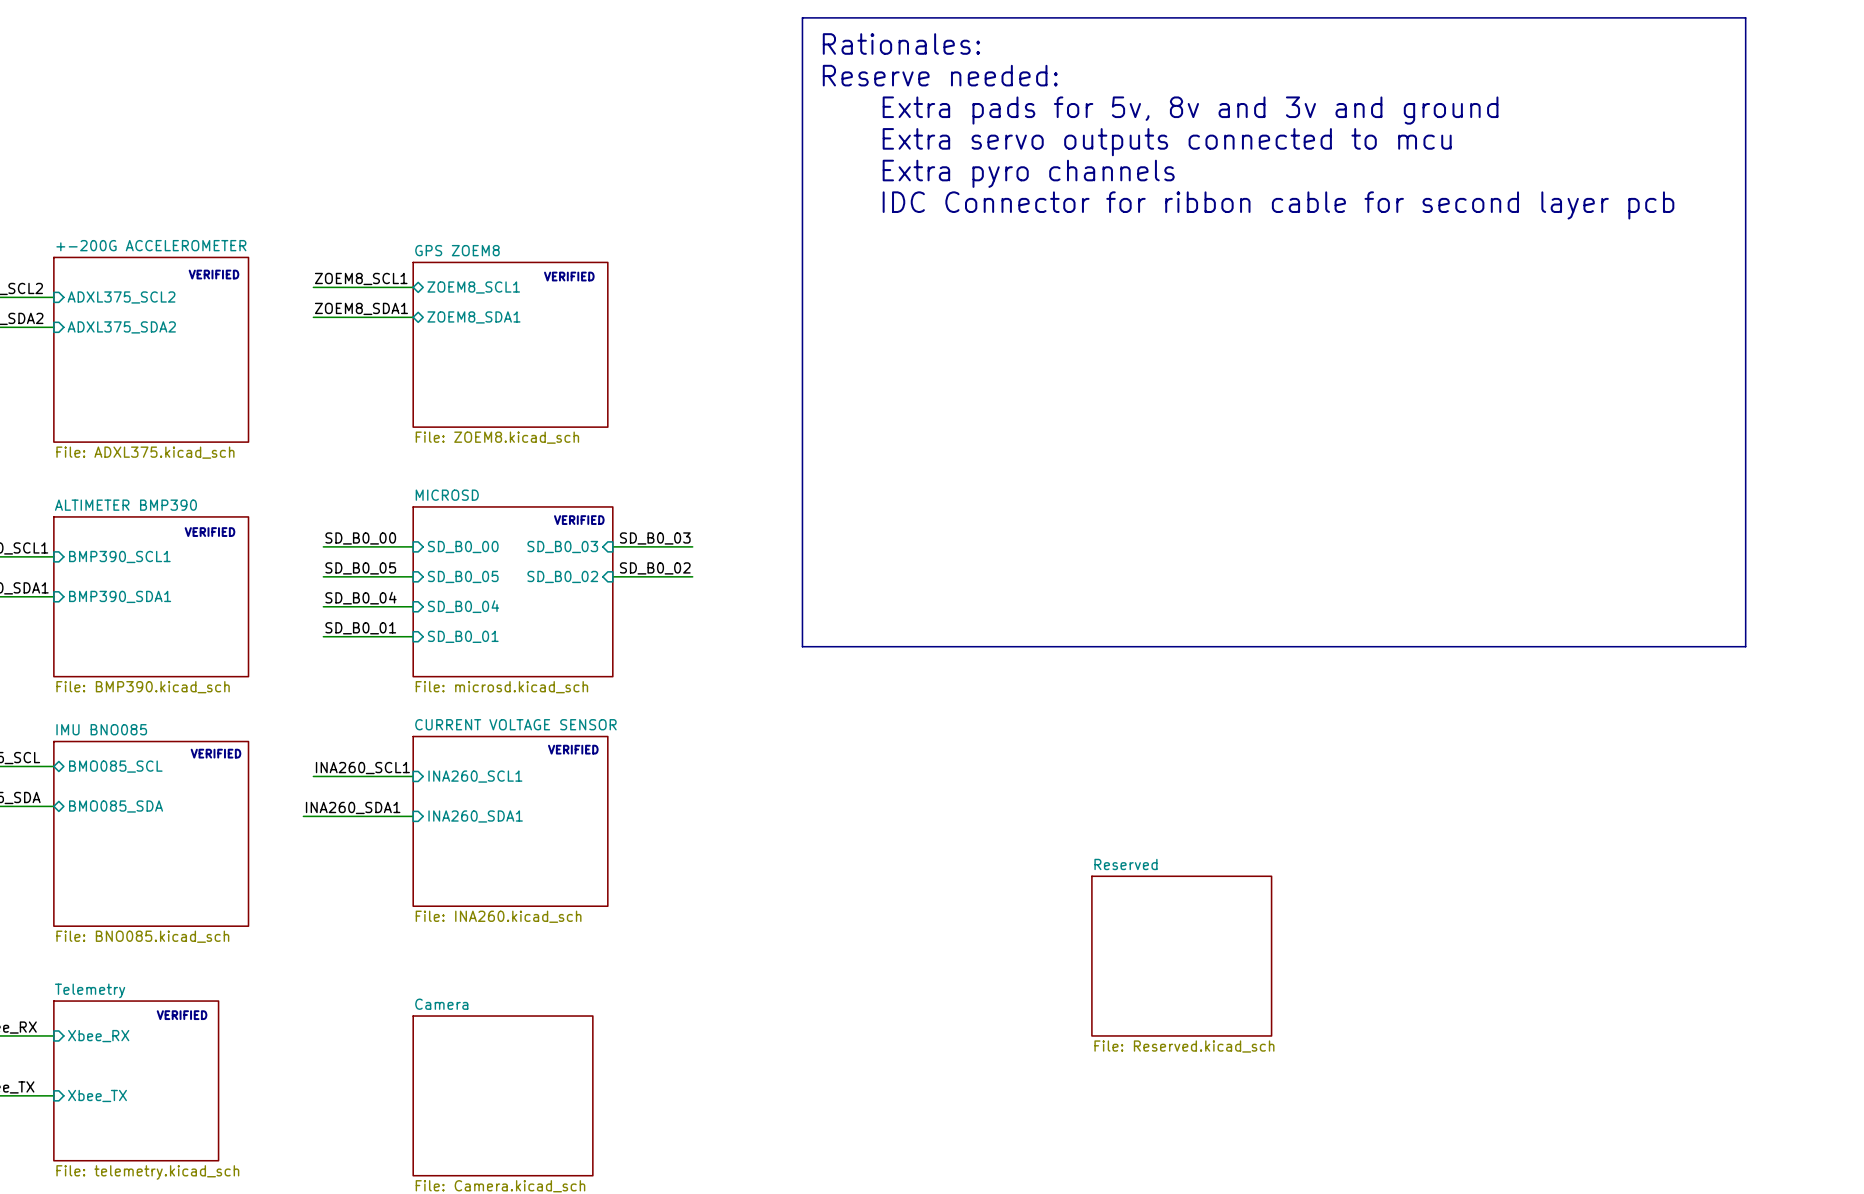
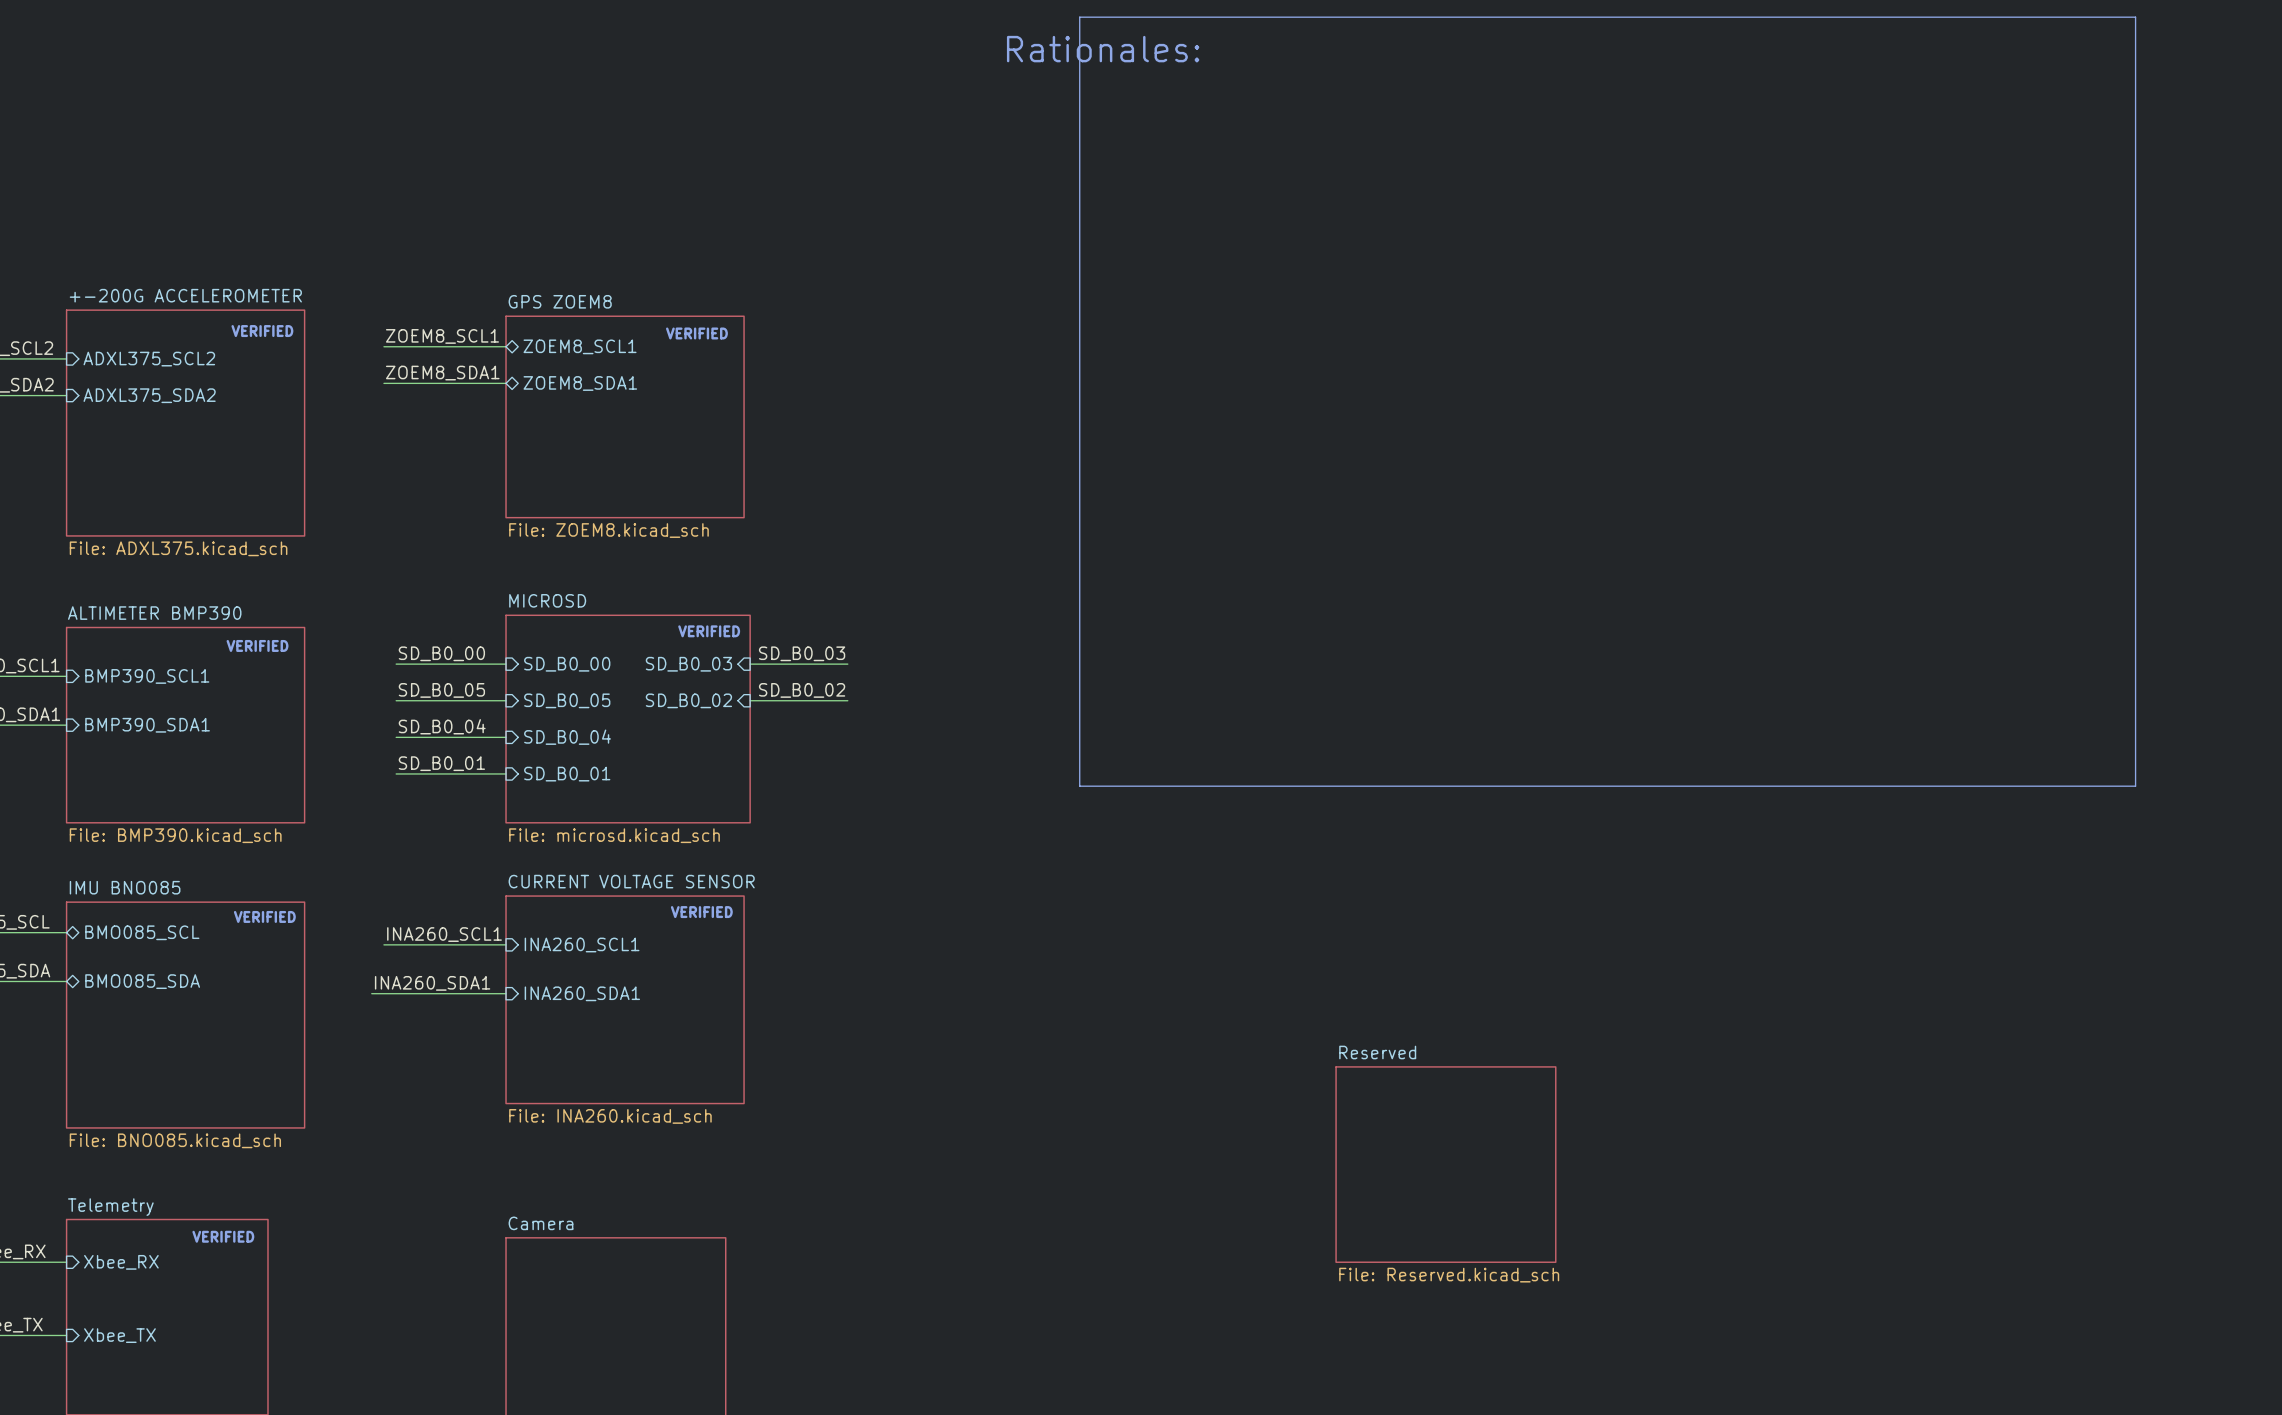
line: (882, 17) (802, 17) (802, 646) (882, 646) -> (1079, 17) (1079, 786)
text: Reserve needed: (940, 75) -> none
text: Extra pads for 5v, 8v and 3v and ground (1190, 110) -> none
text: Extra servo outputs connected to mcu (1167, 142) -> none
text: Extra pyro channels (1028, 173) -> none
text: IDC Connector for ribbon cable for second layer pcb (1278, 205) -> none

